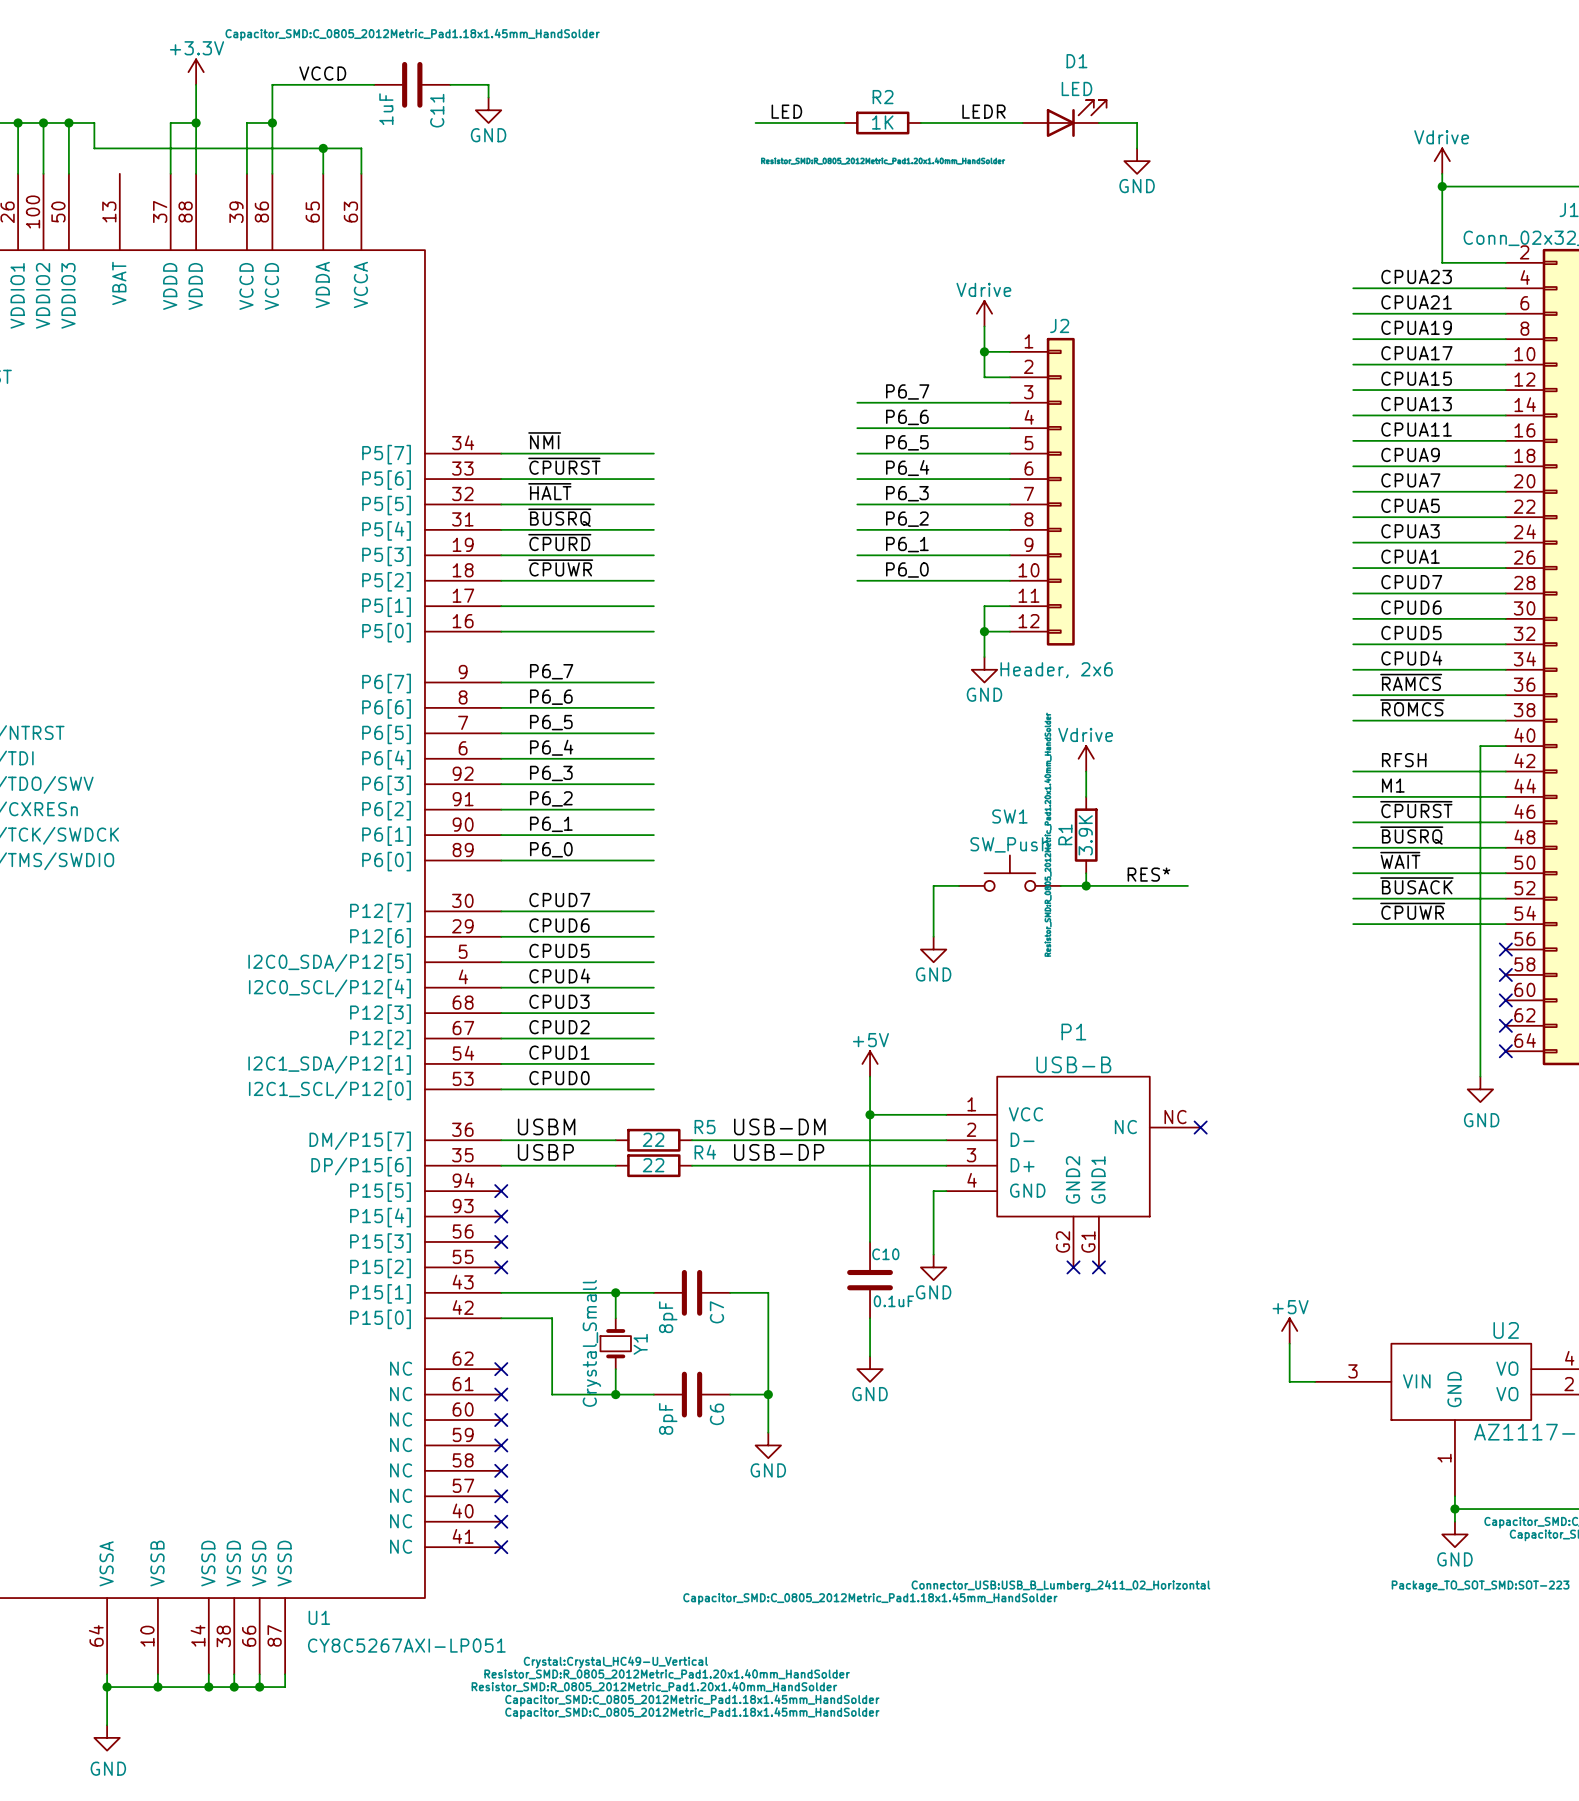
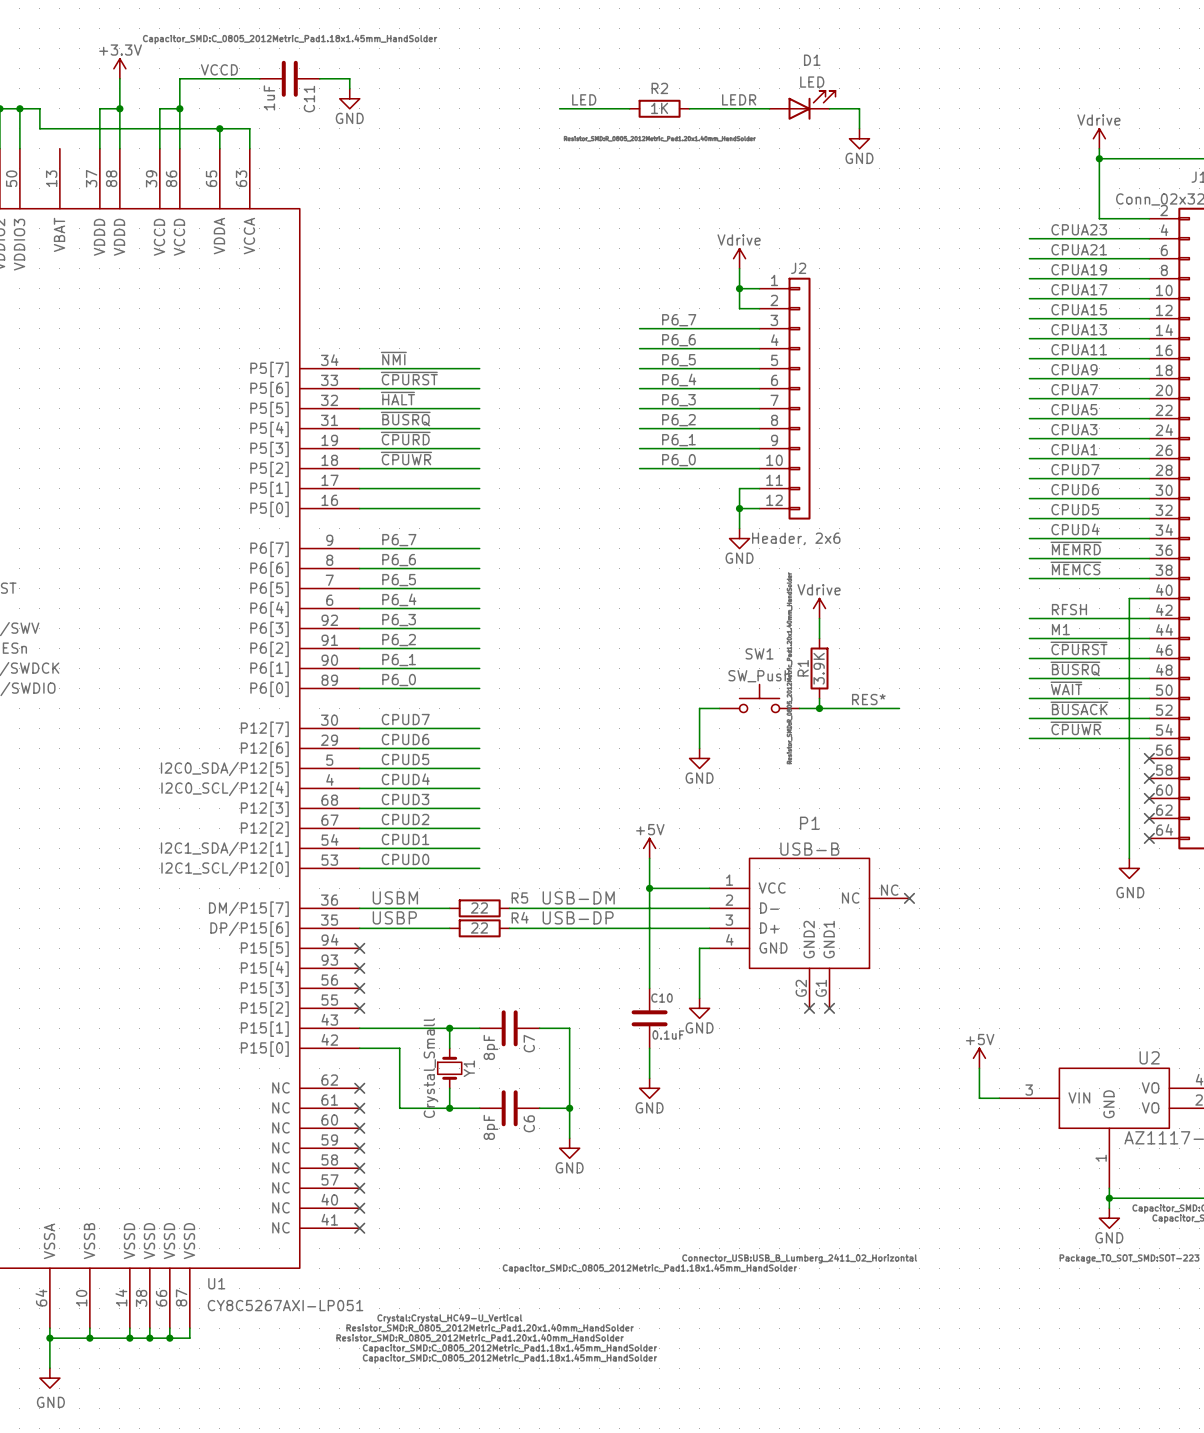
label: ~{RAMCS} (1411, 682) -> ~{MEMRD} (1076, 548)
label: ~{ROMCS} (1412, 707) -> ~{MEMCS} (1075, 568)

